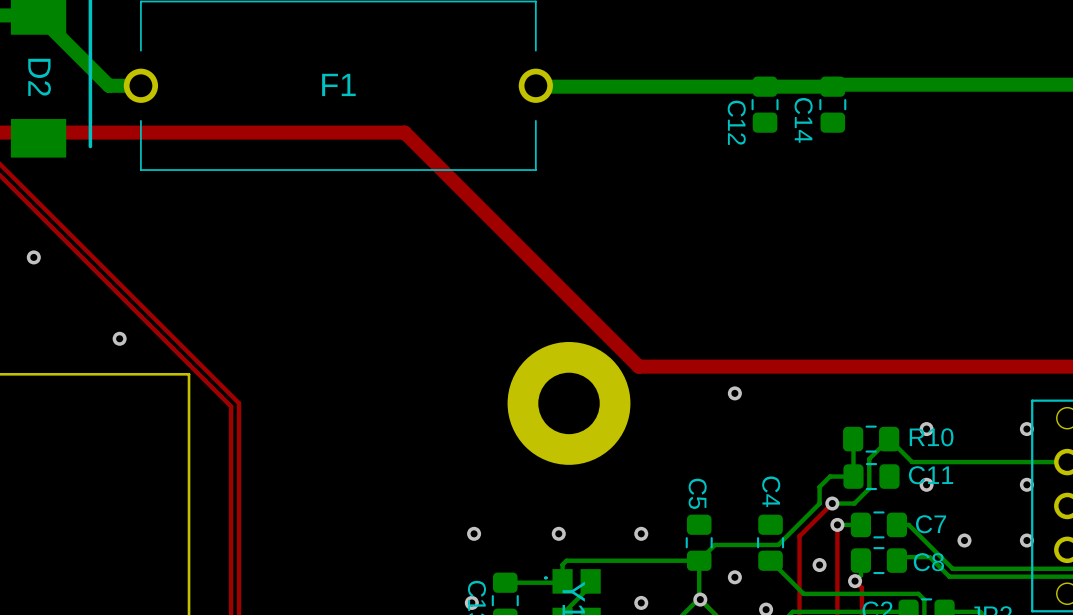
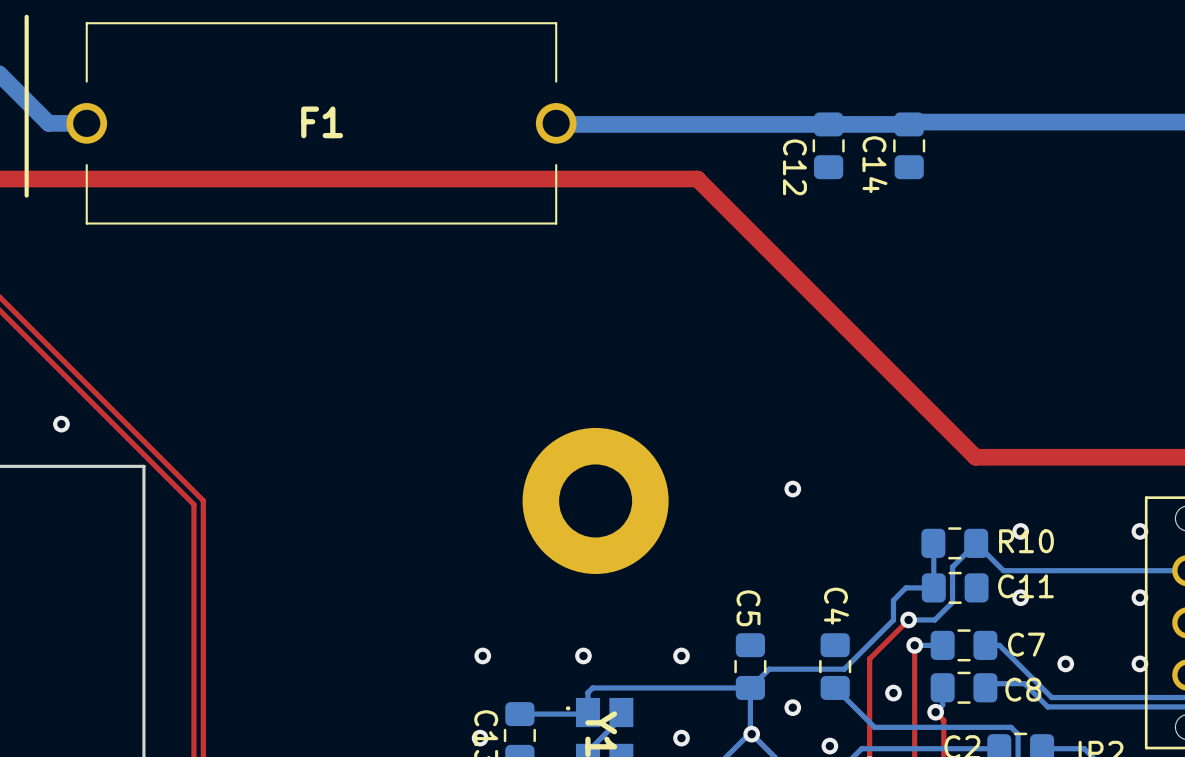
top track: (404, 132) (638, 366) (888, 366) -> (400, 179) (697, 179) (975, 457)

